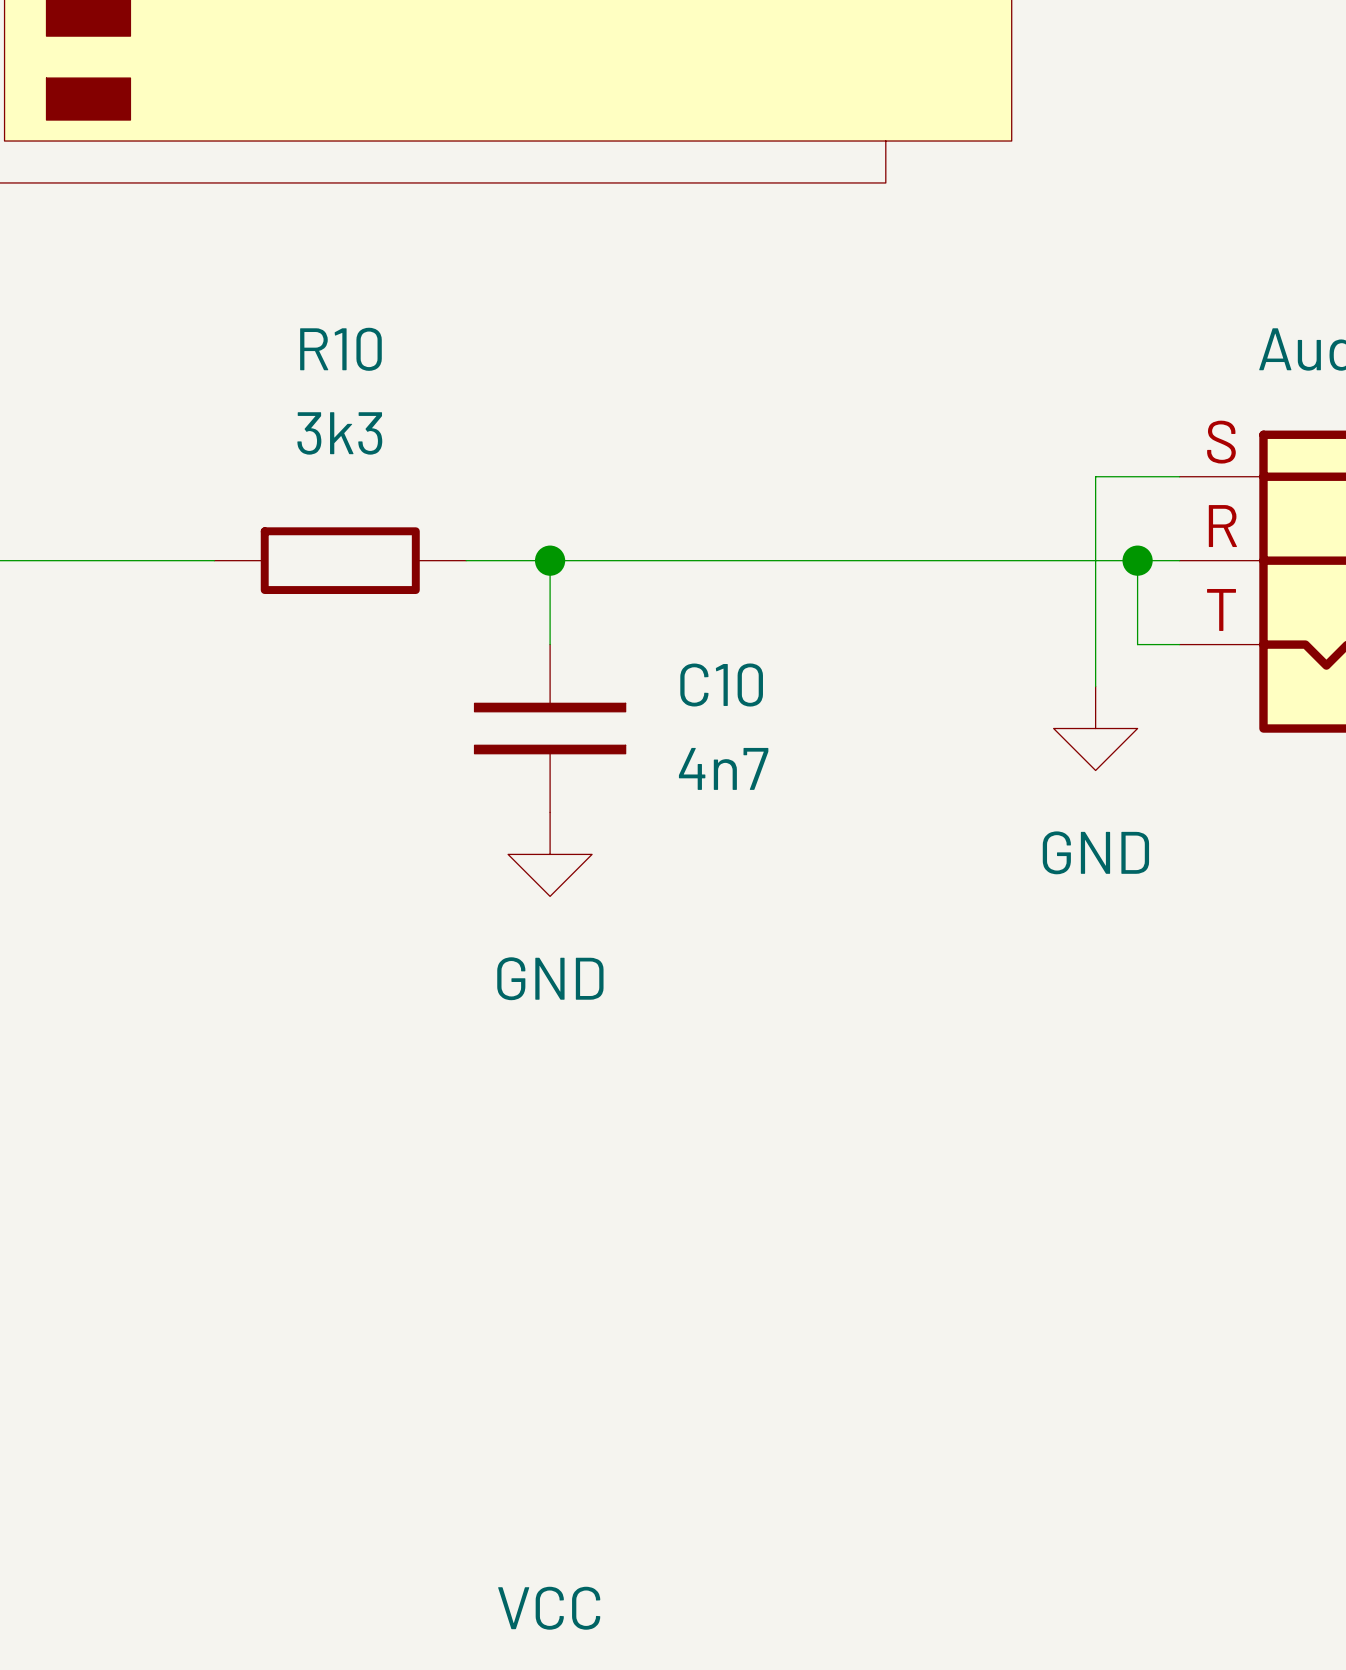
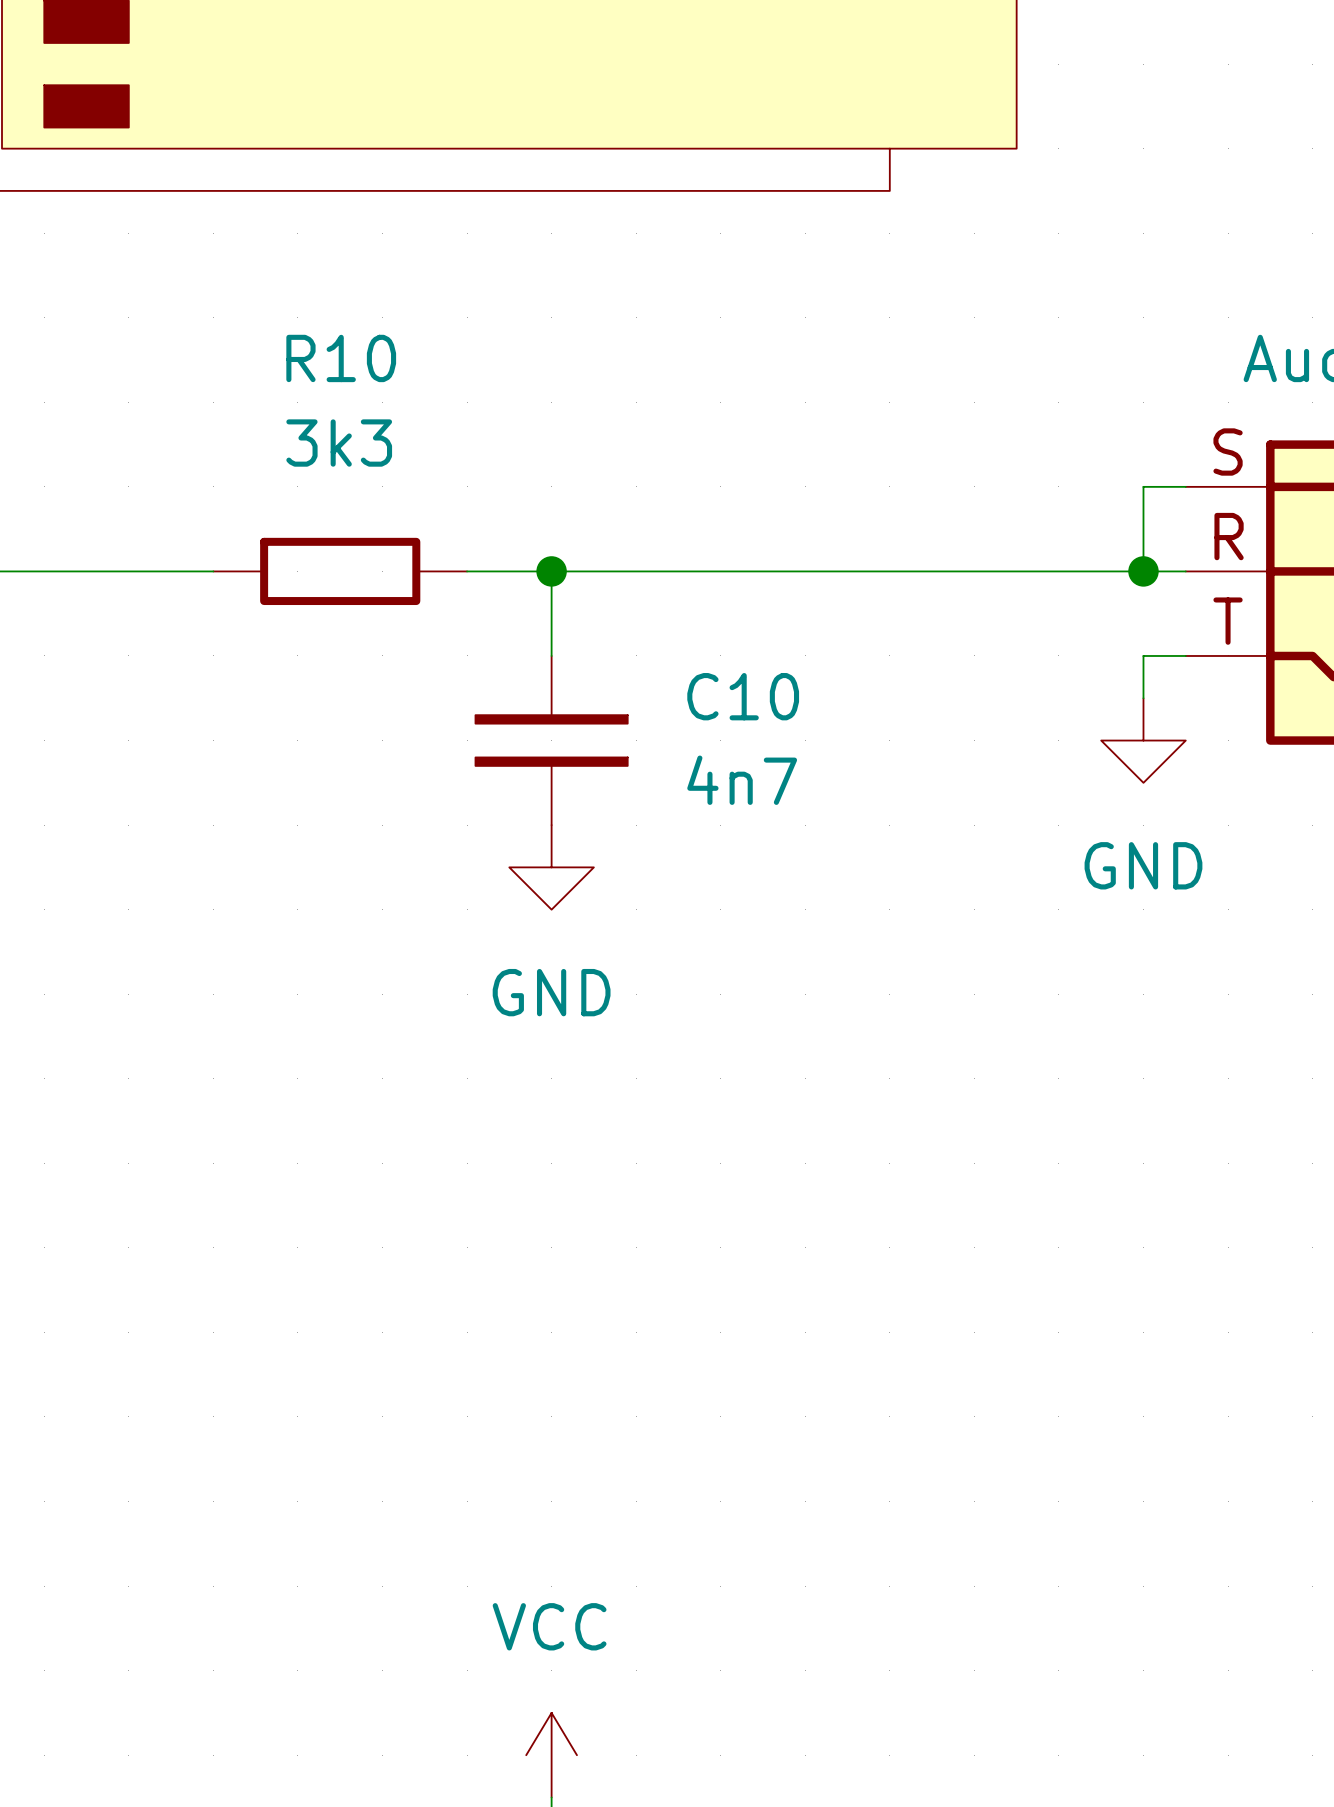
wire: (1137, 476) (1095, 476) (1095, 686) -> (1143, 486) (1143, 571)
wire: (1137, 560) (1137, 644) -> (1143, 698) (1143, 655)
power symbol position: GND (1095, 728) -> GND (1143, 740)

